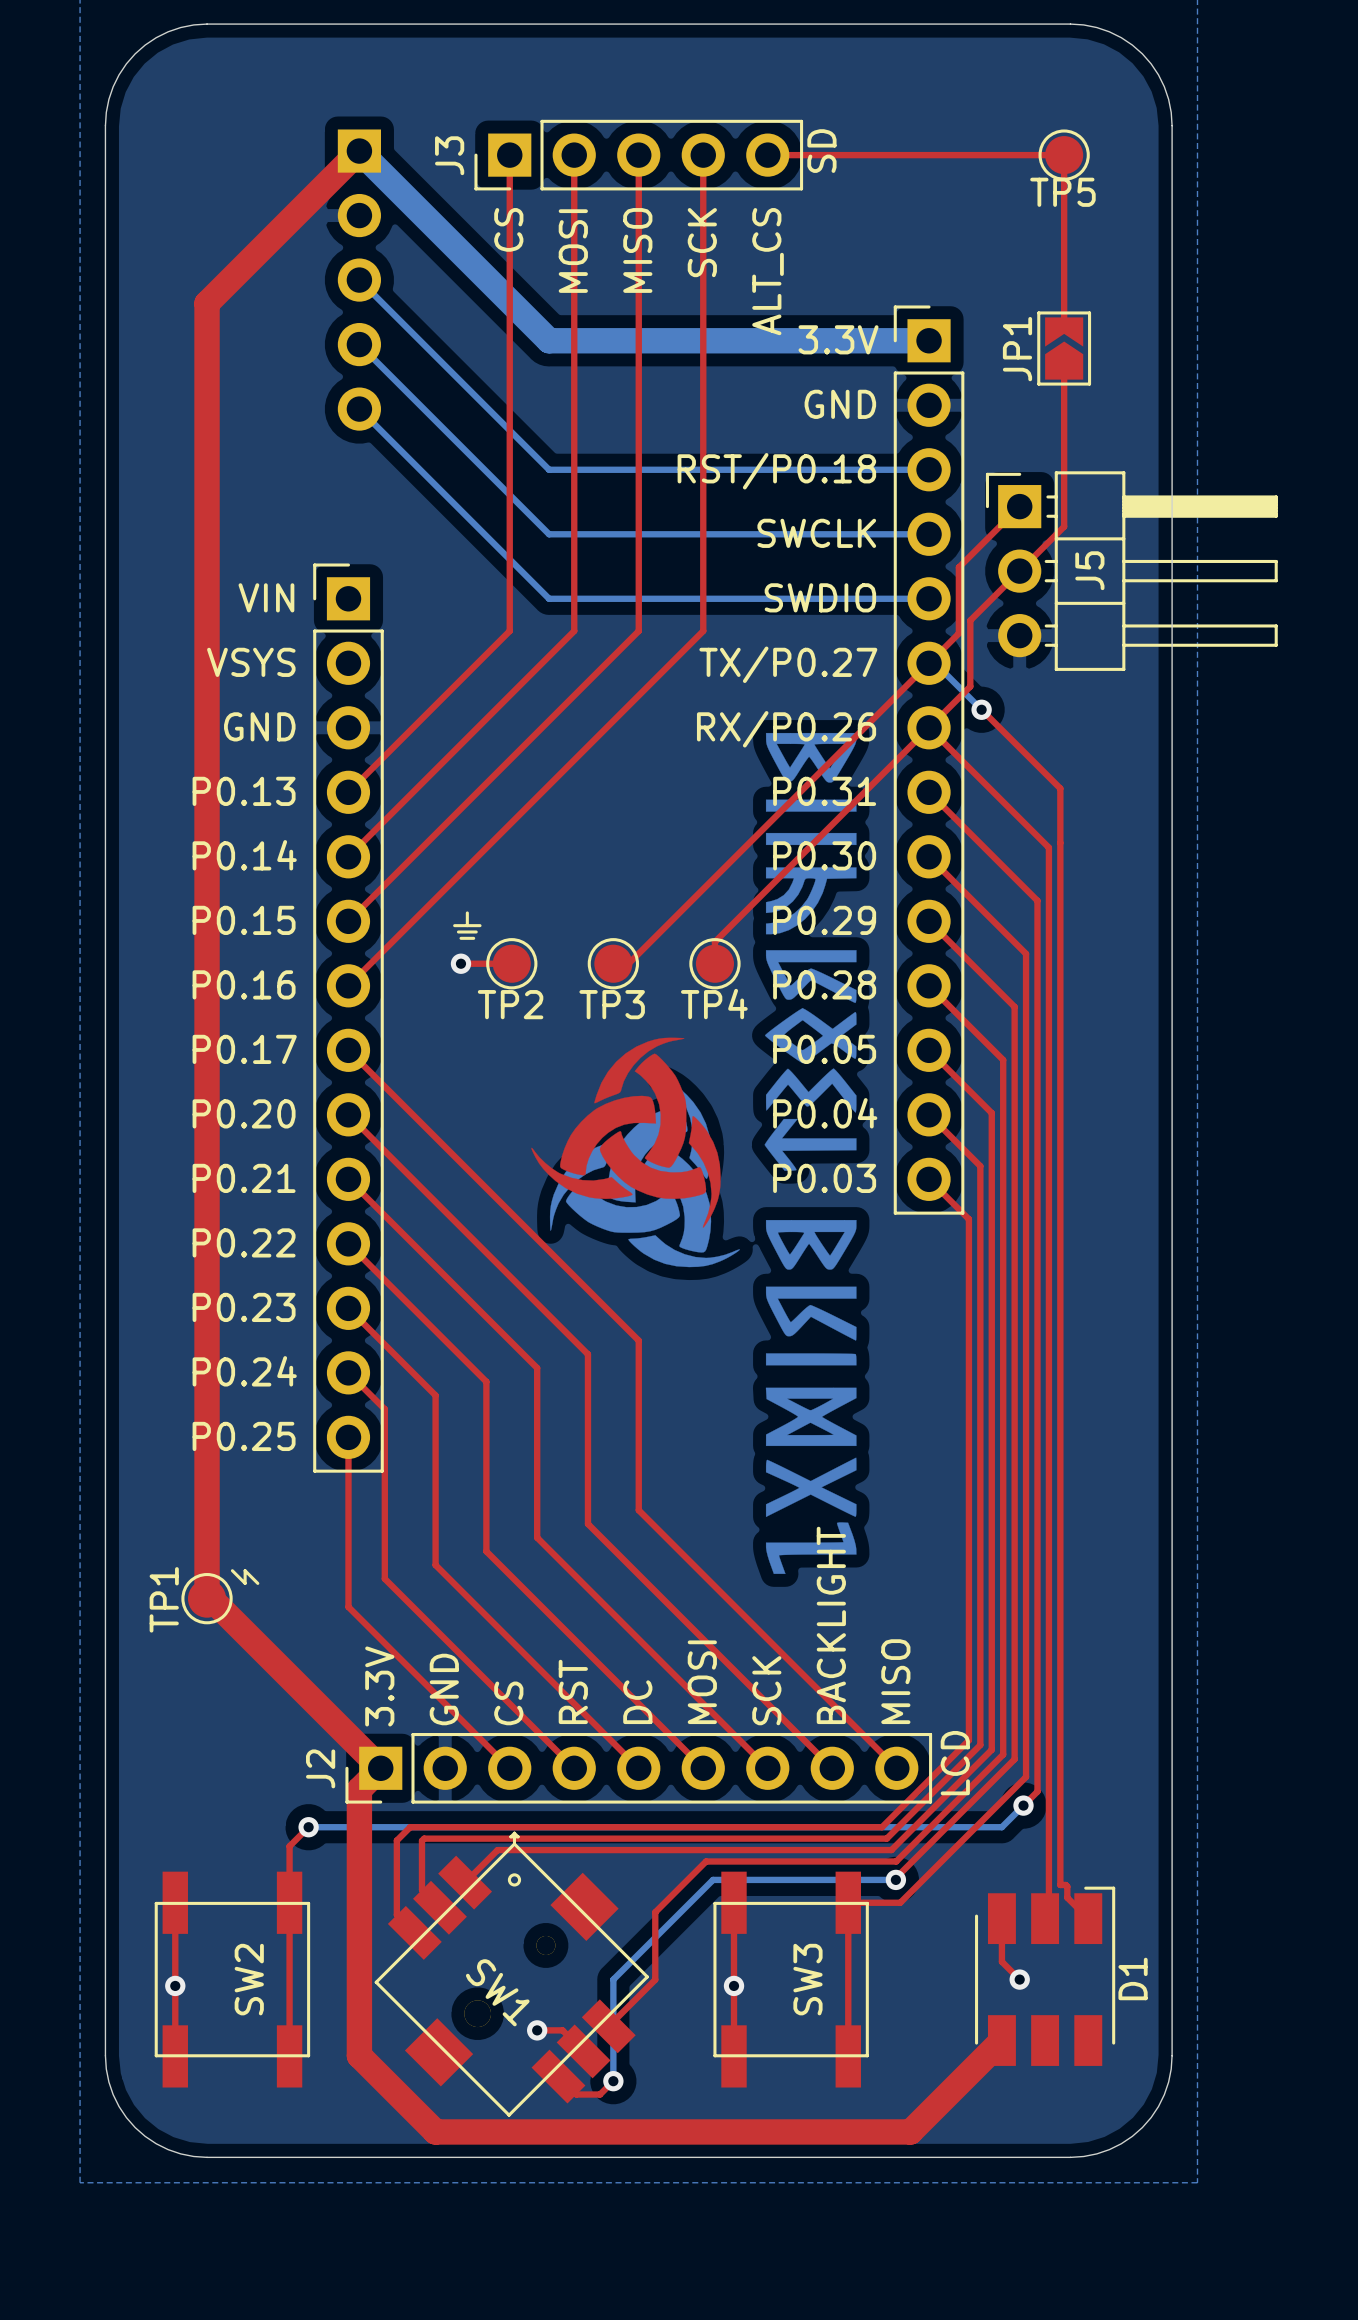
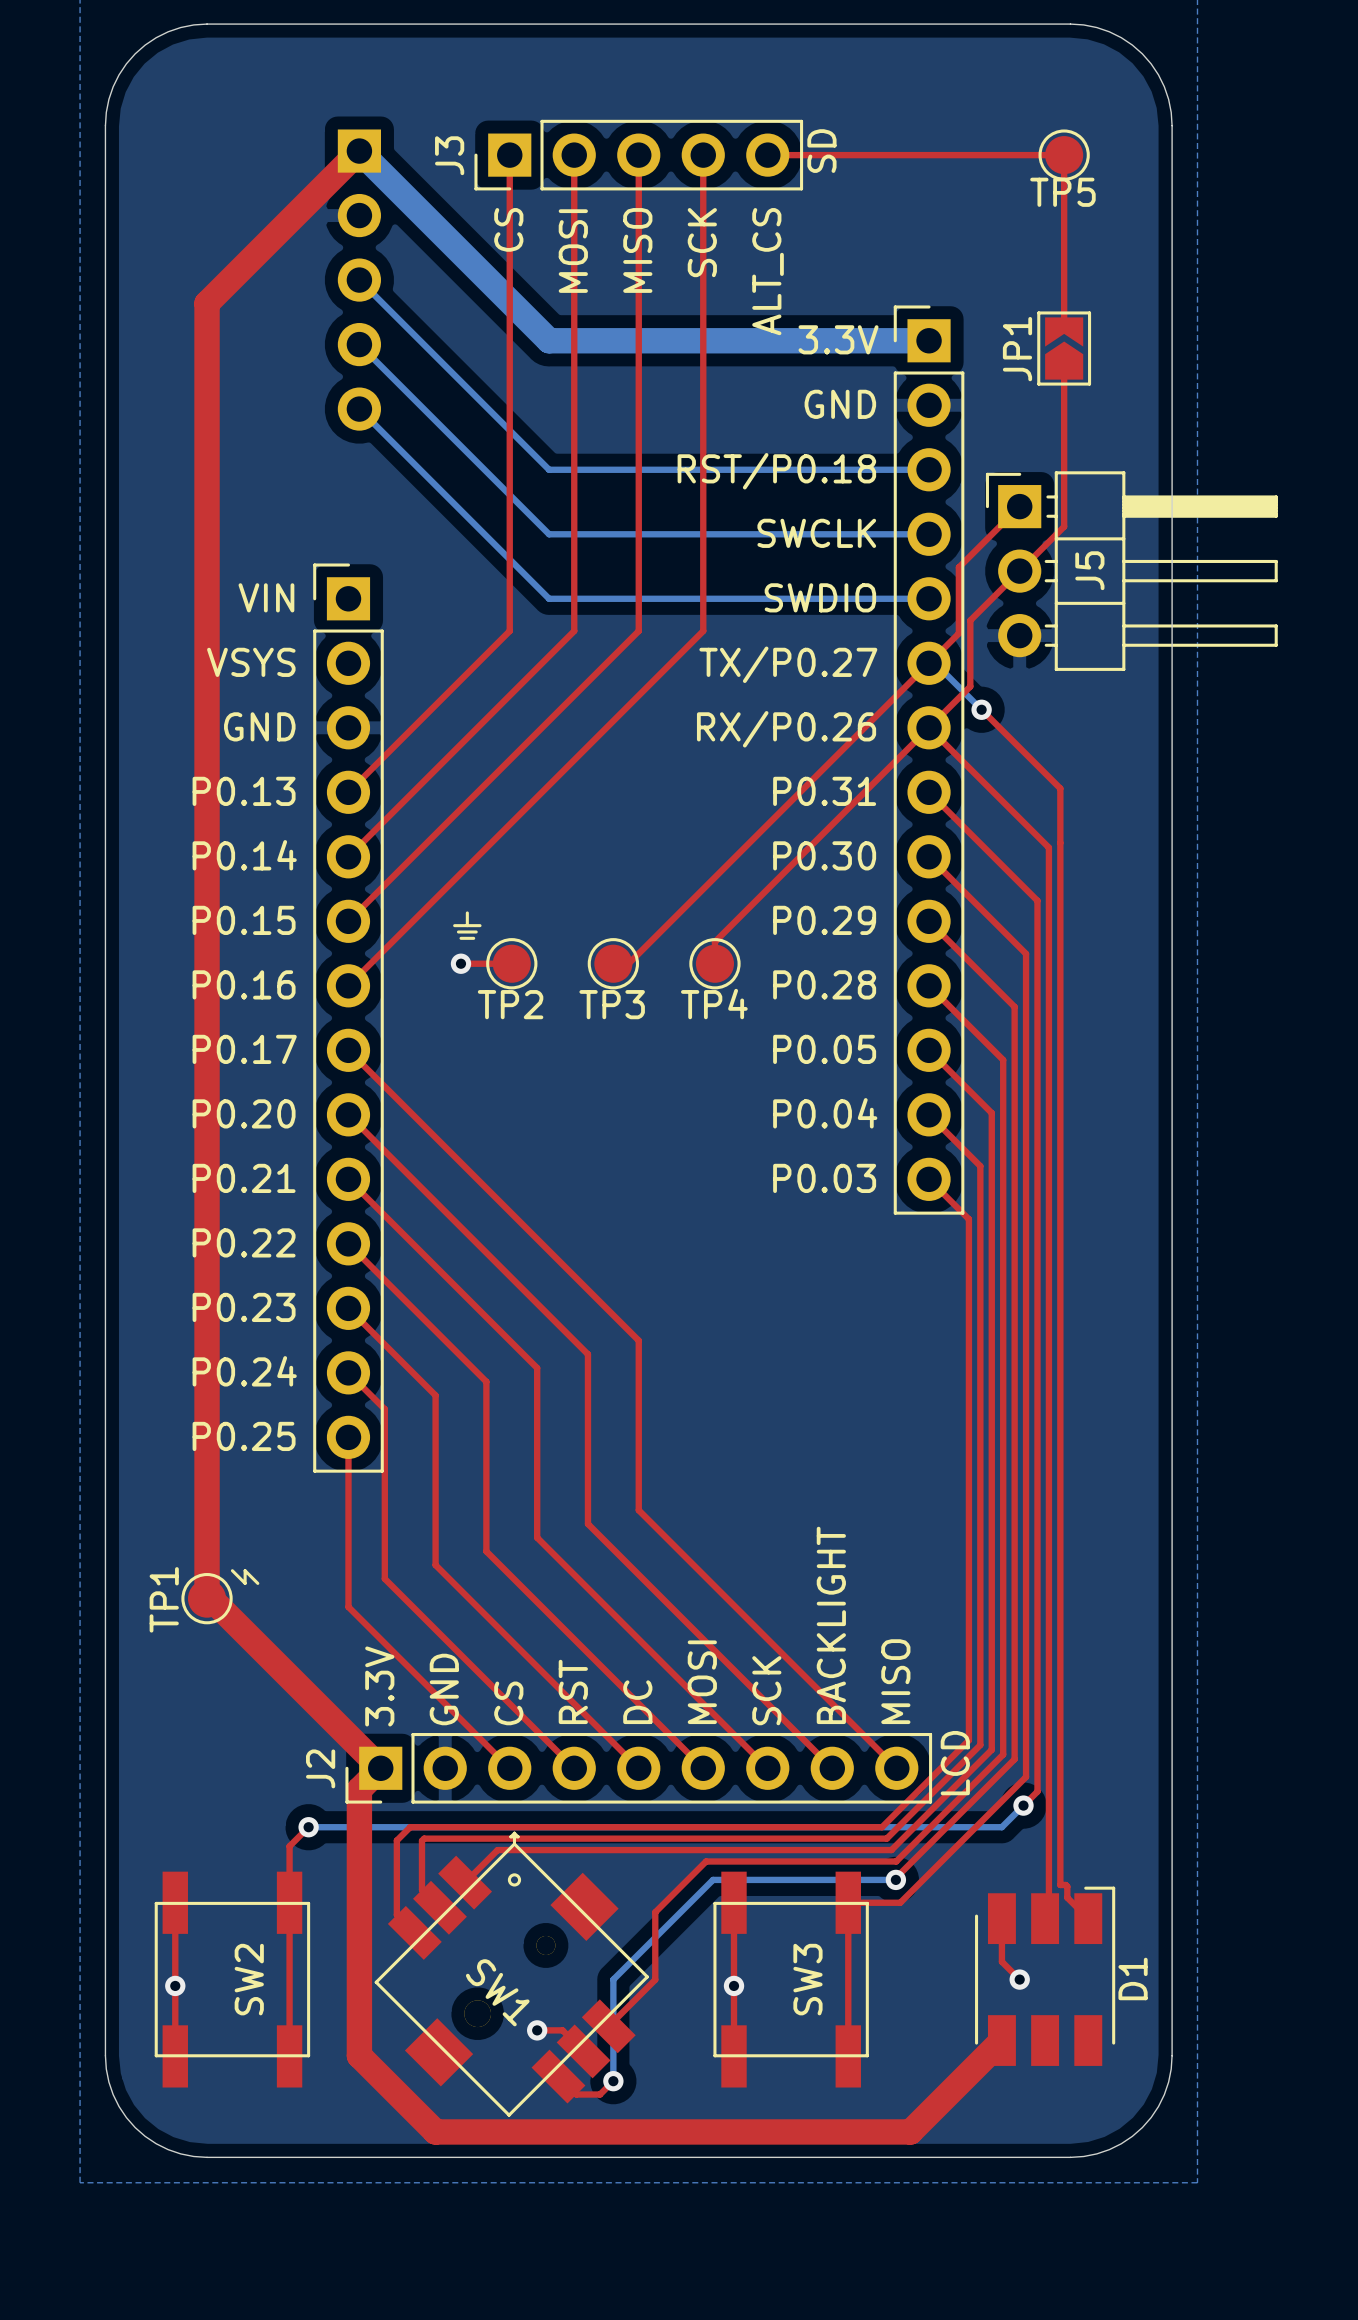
drawing: [531, 732, 857, 1574] -> none

